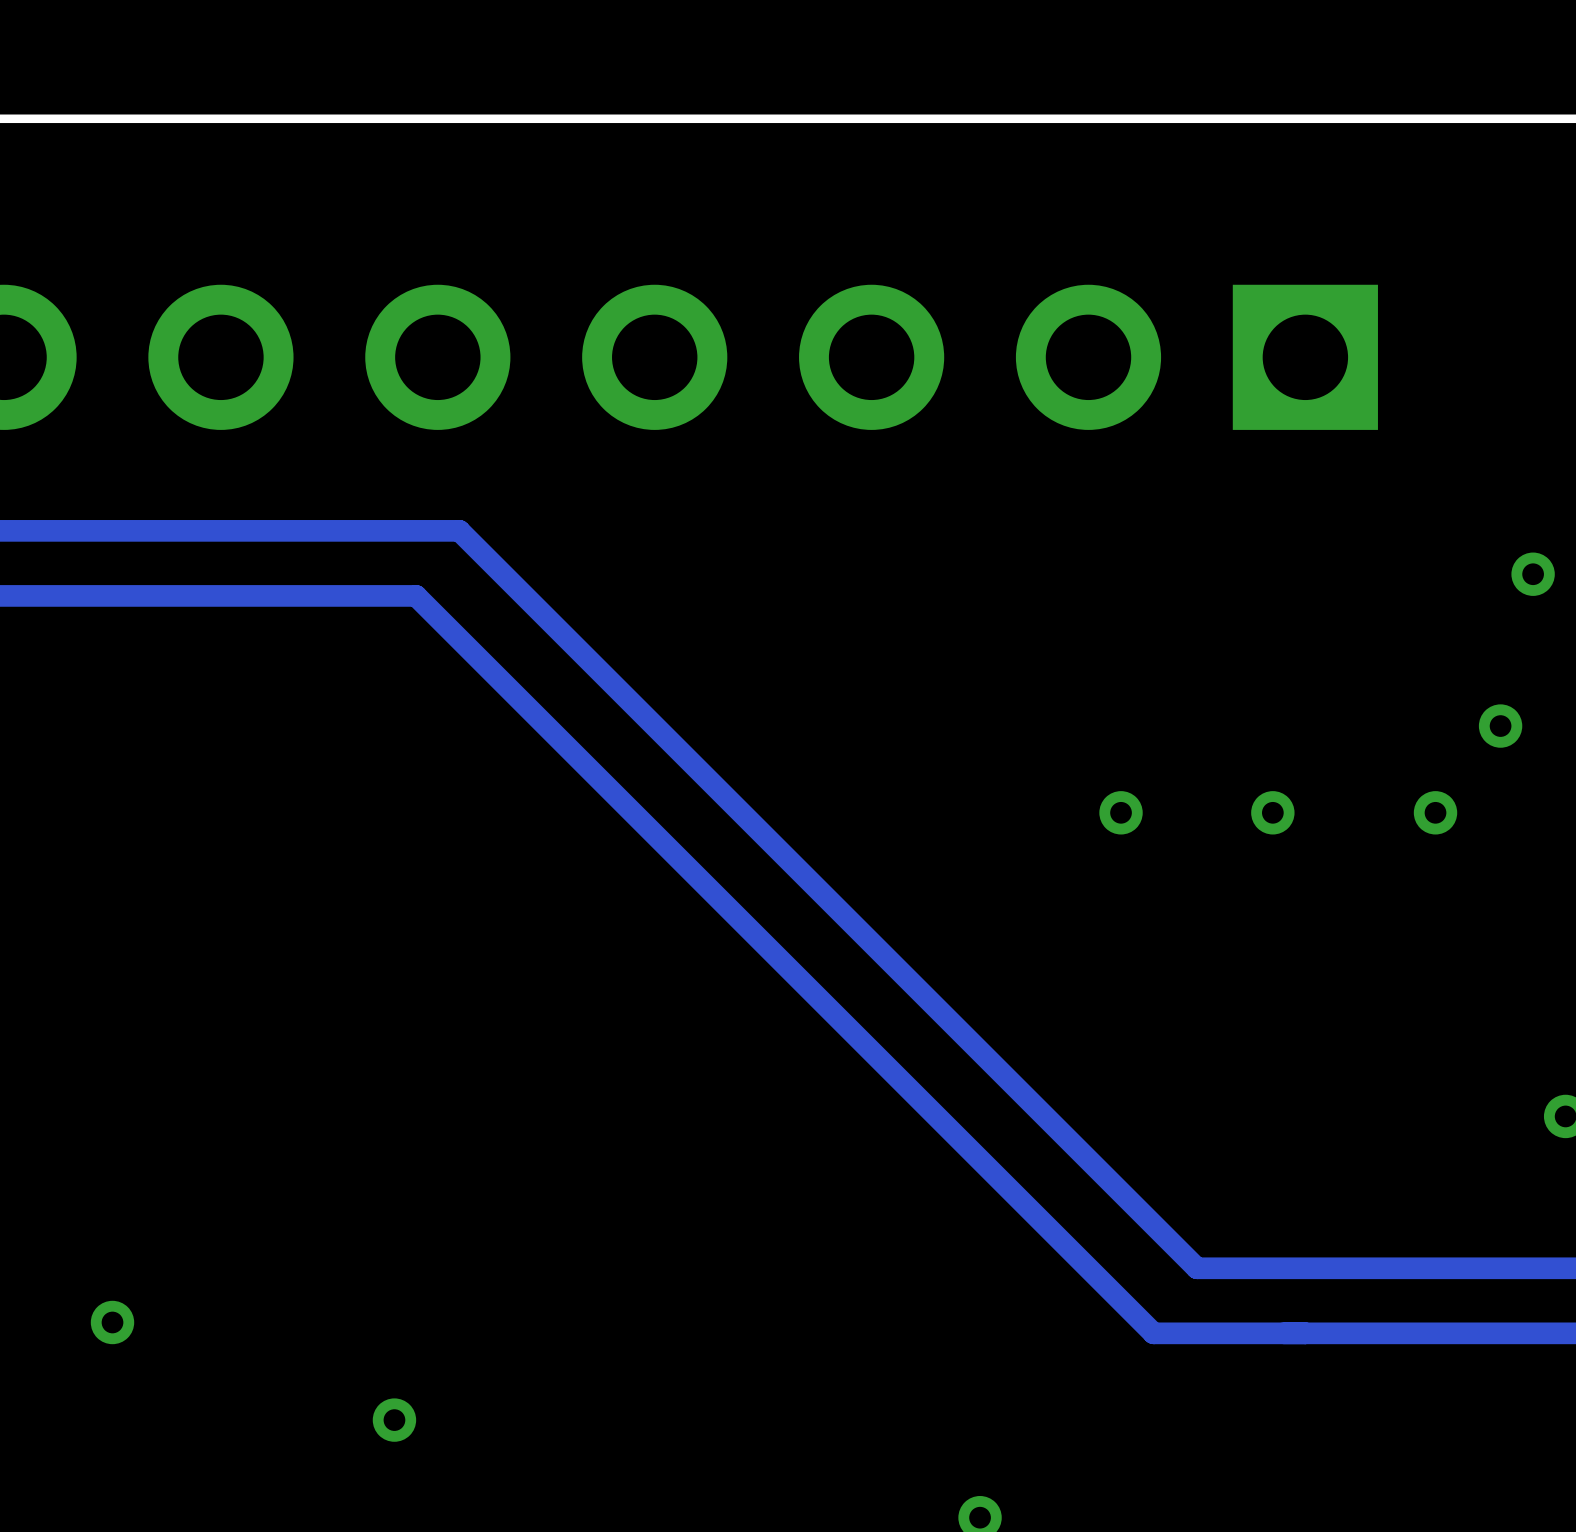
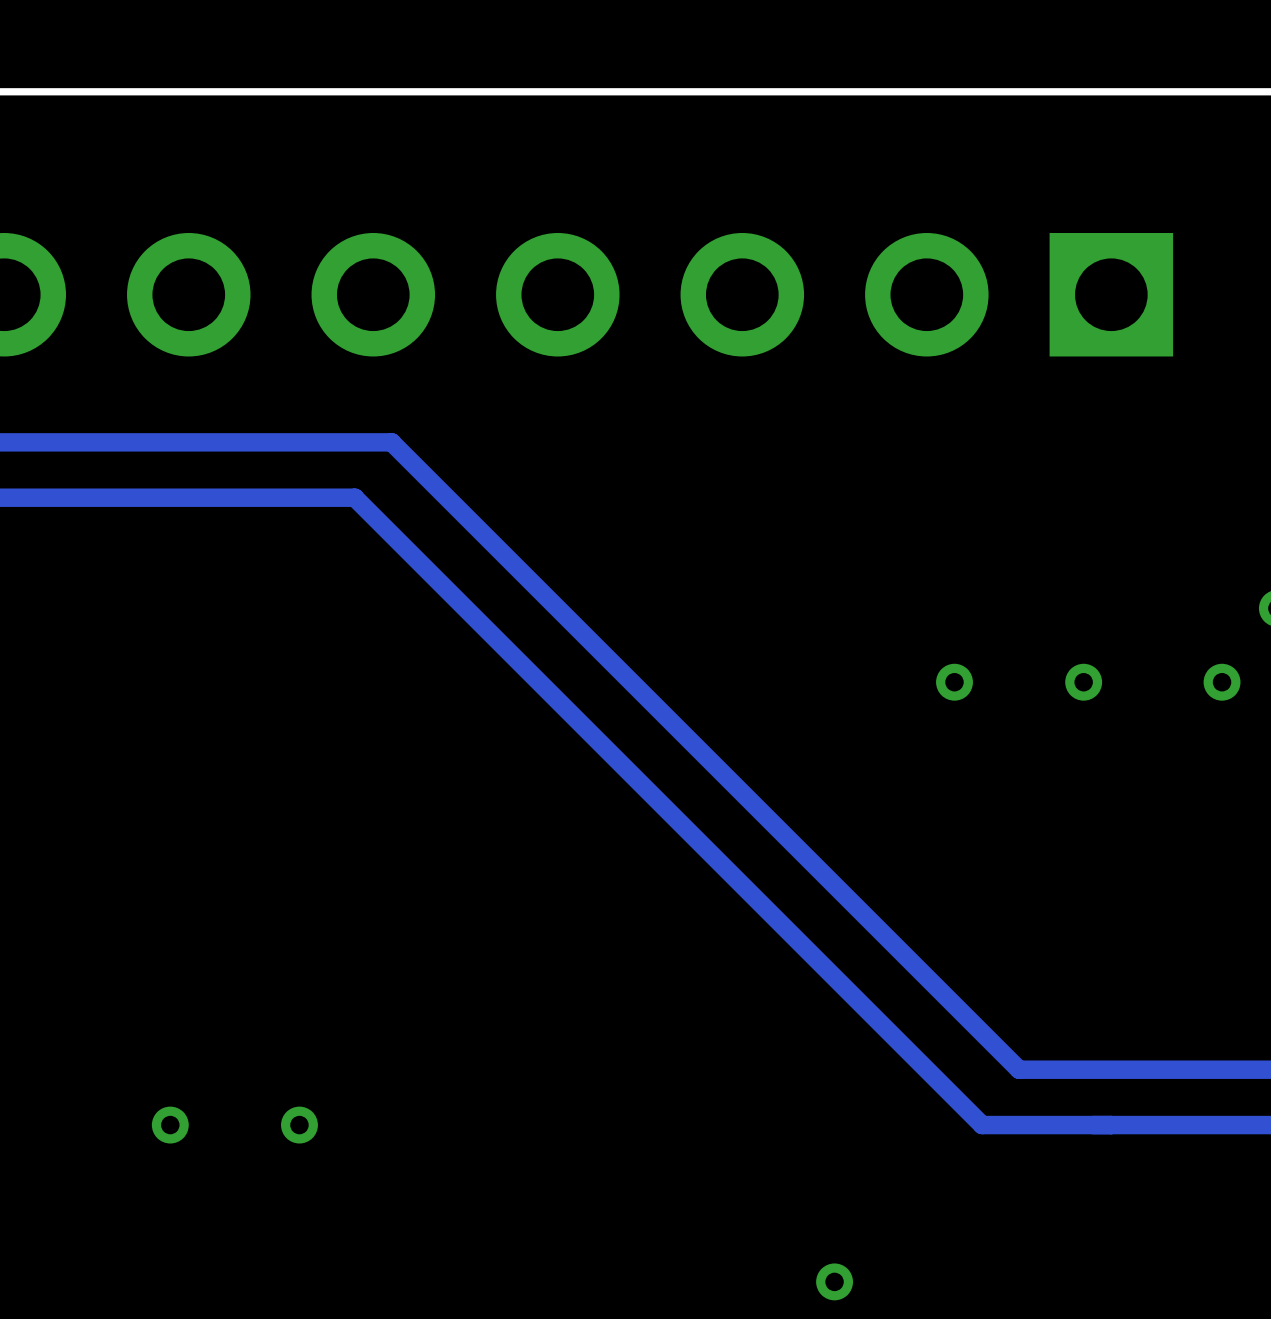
via position: (112, 1322) -> (170, 1125)
via position: (394, 1420) -> (299, 1125)

